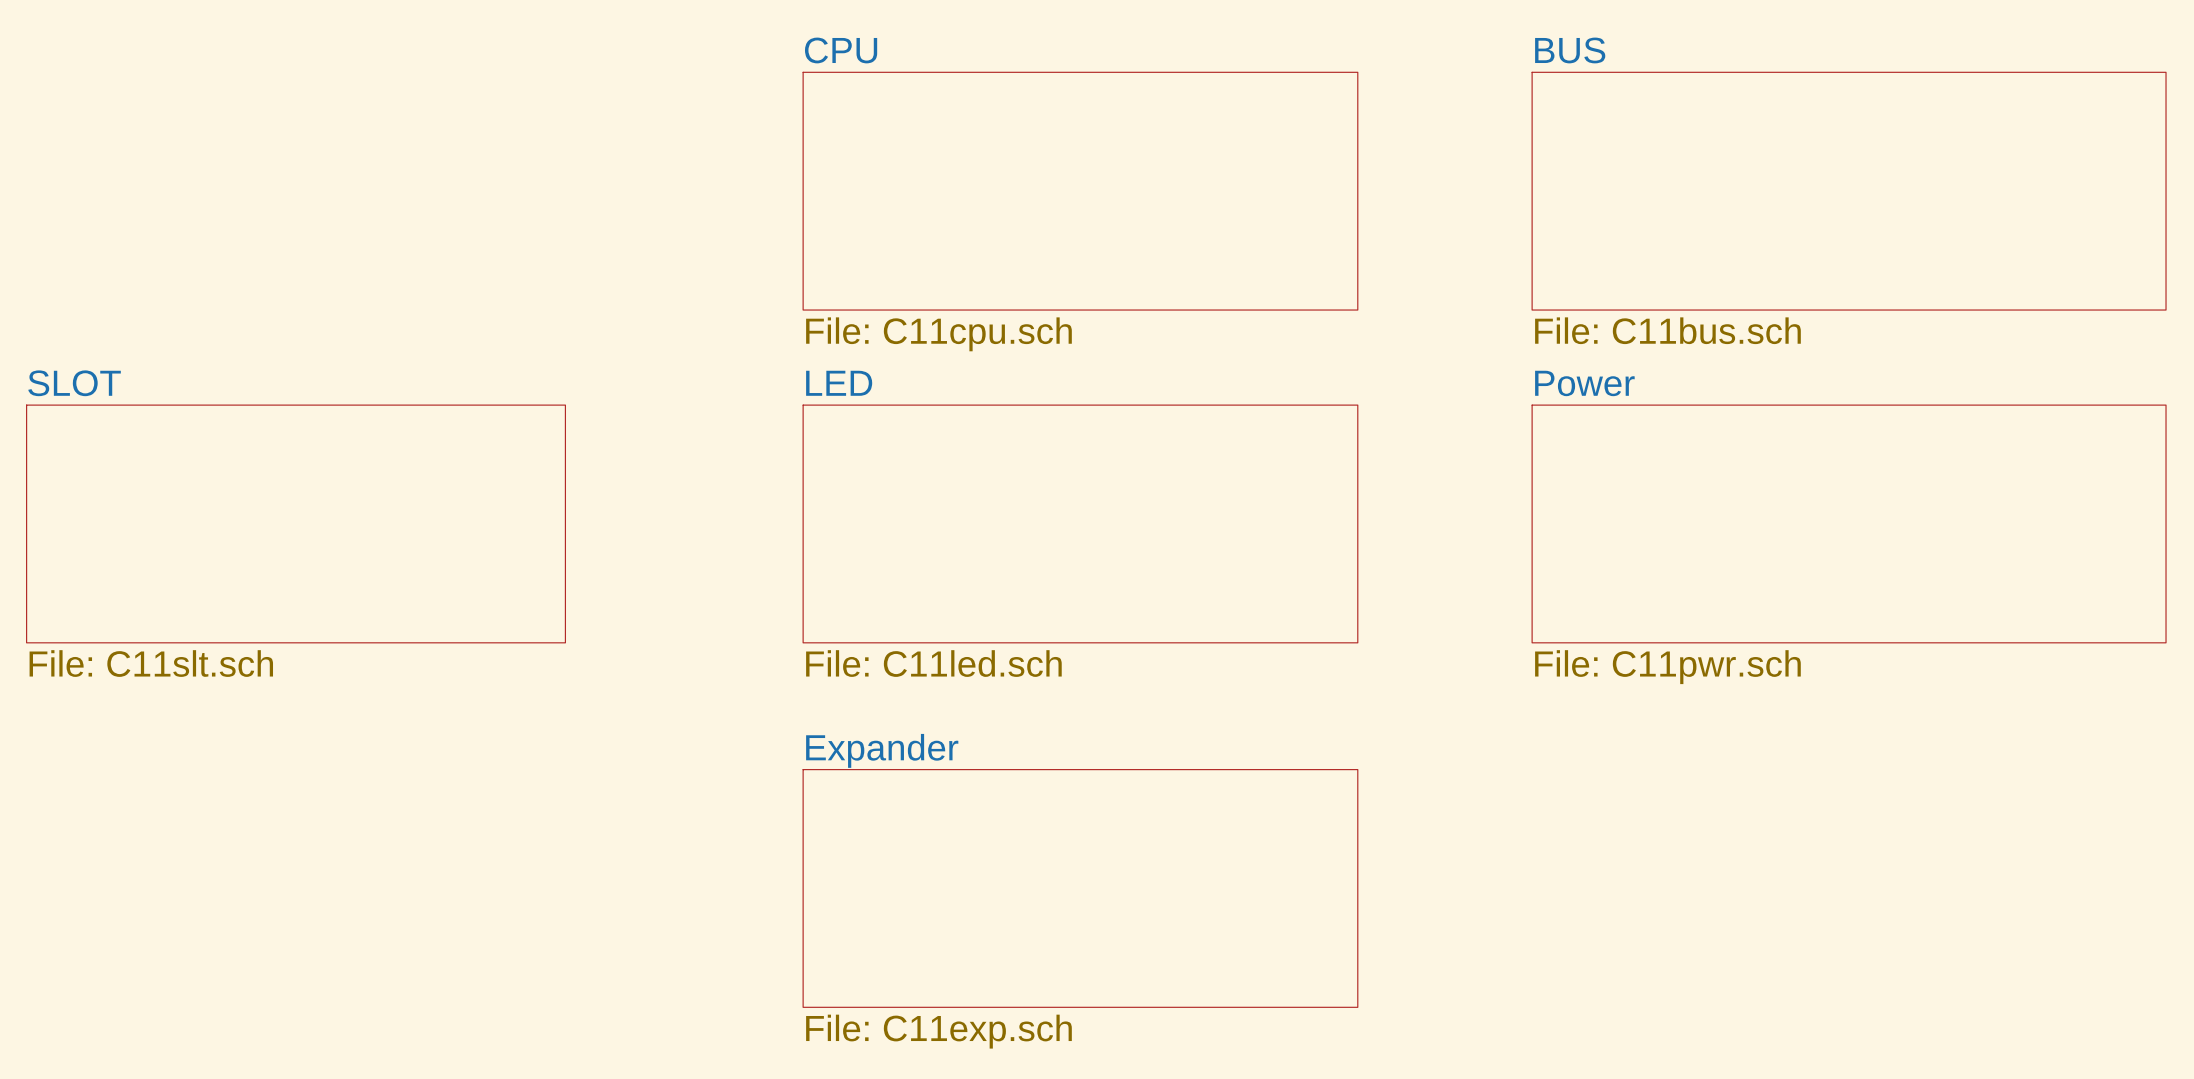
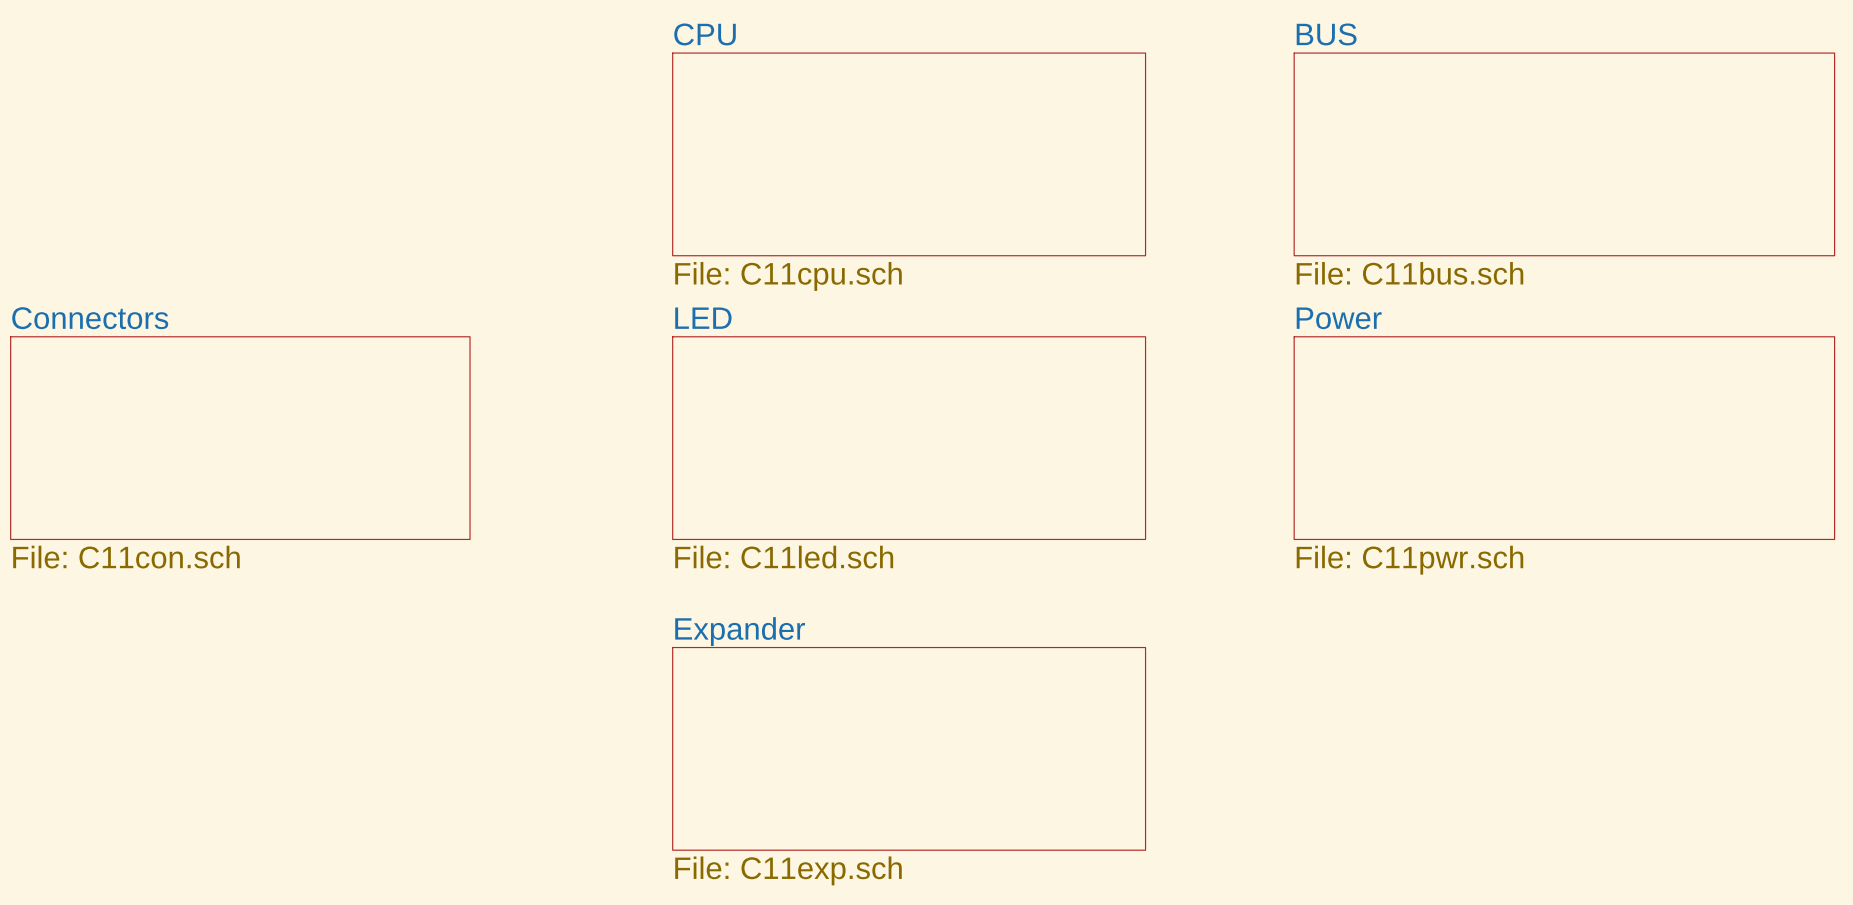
sheet SLOT name: SLOT (74, 383) -> Connectors (90, 318)
sheet SLOT value: File: C11slt.sch (151, 663) -> File: C11con.sch (126, 557)

